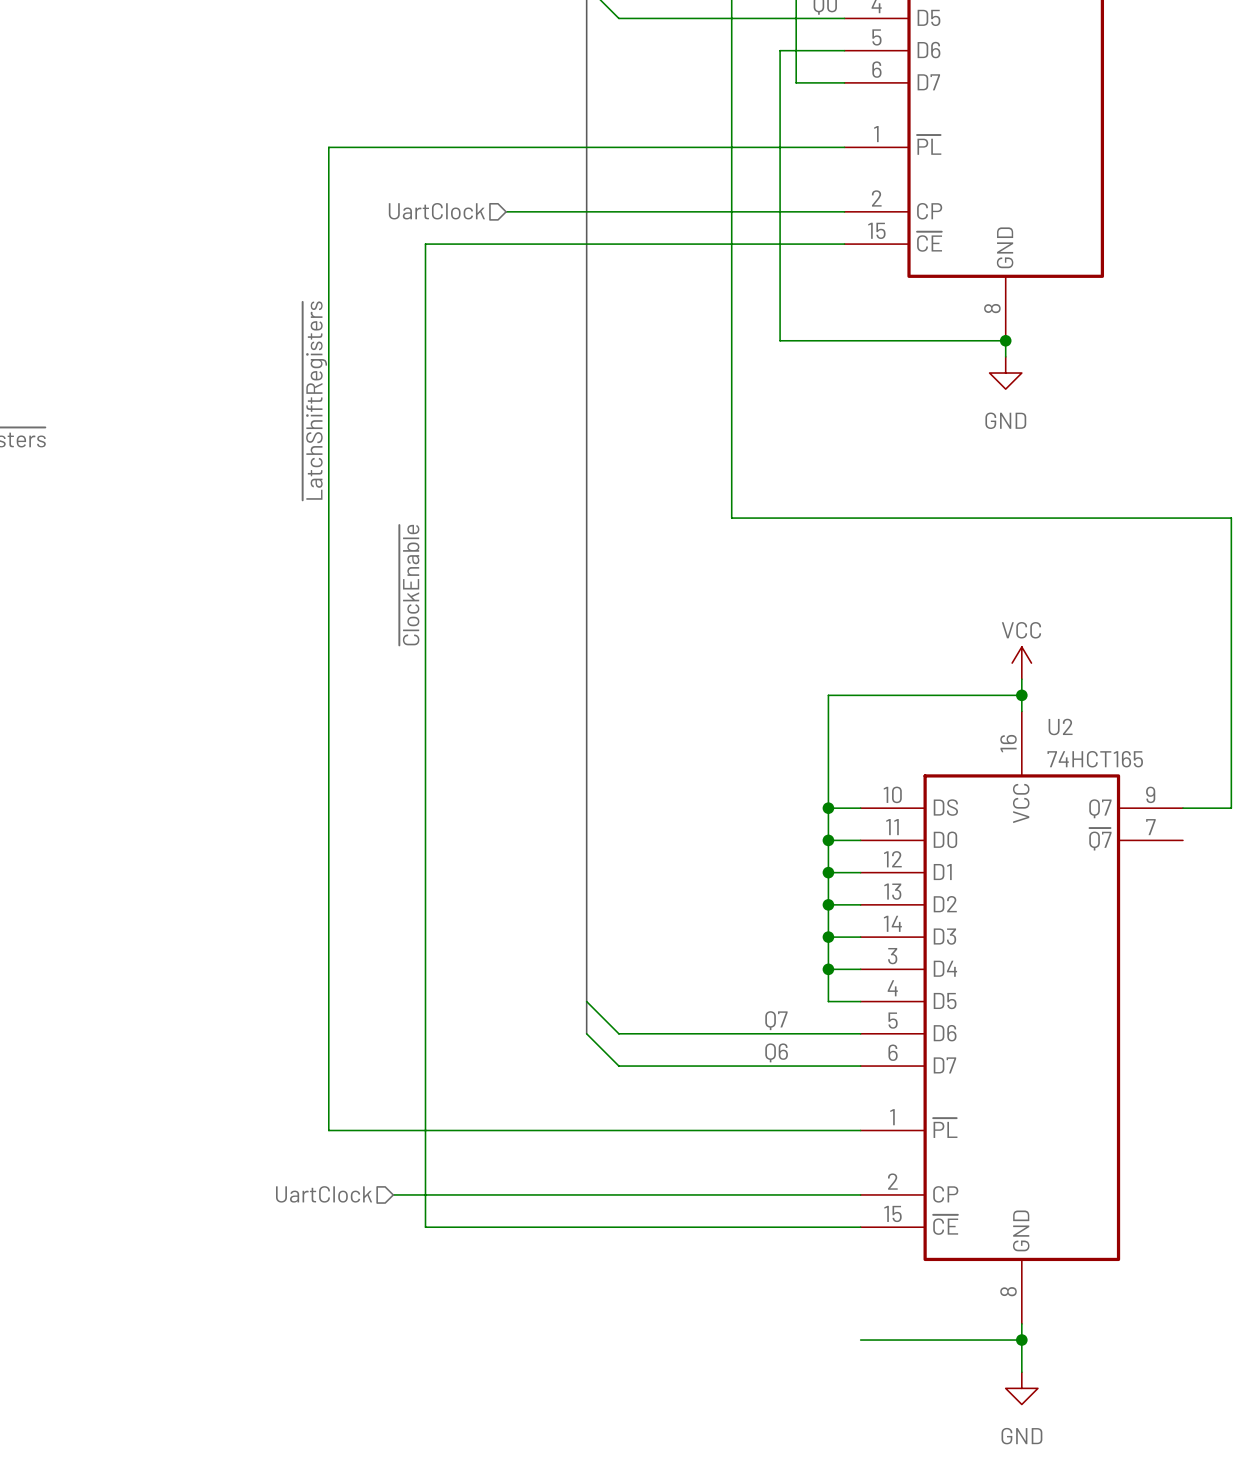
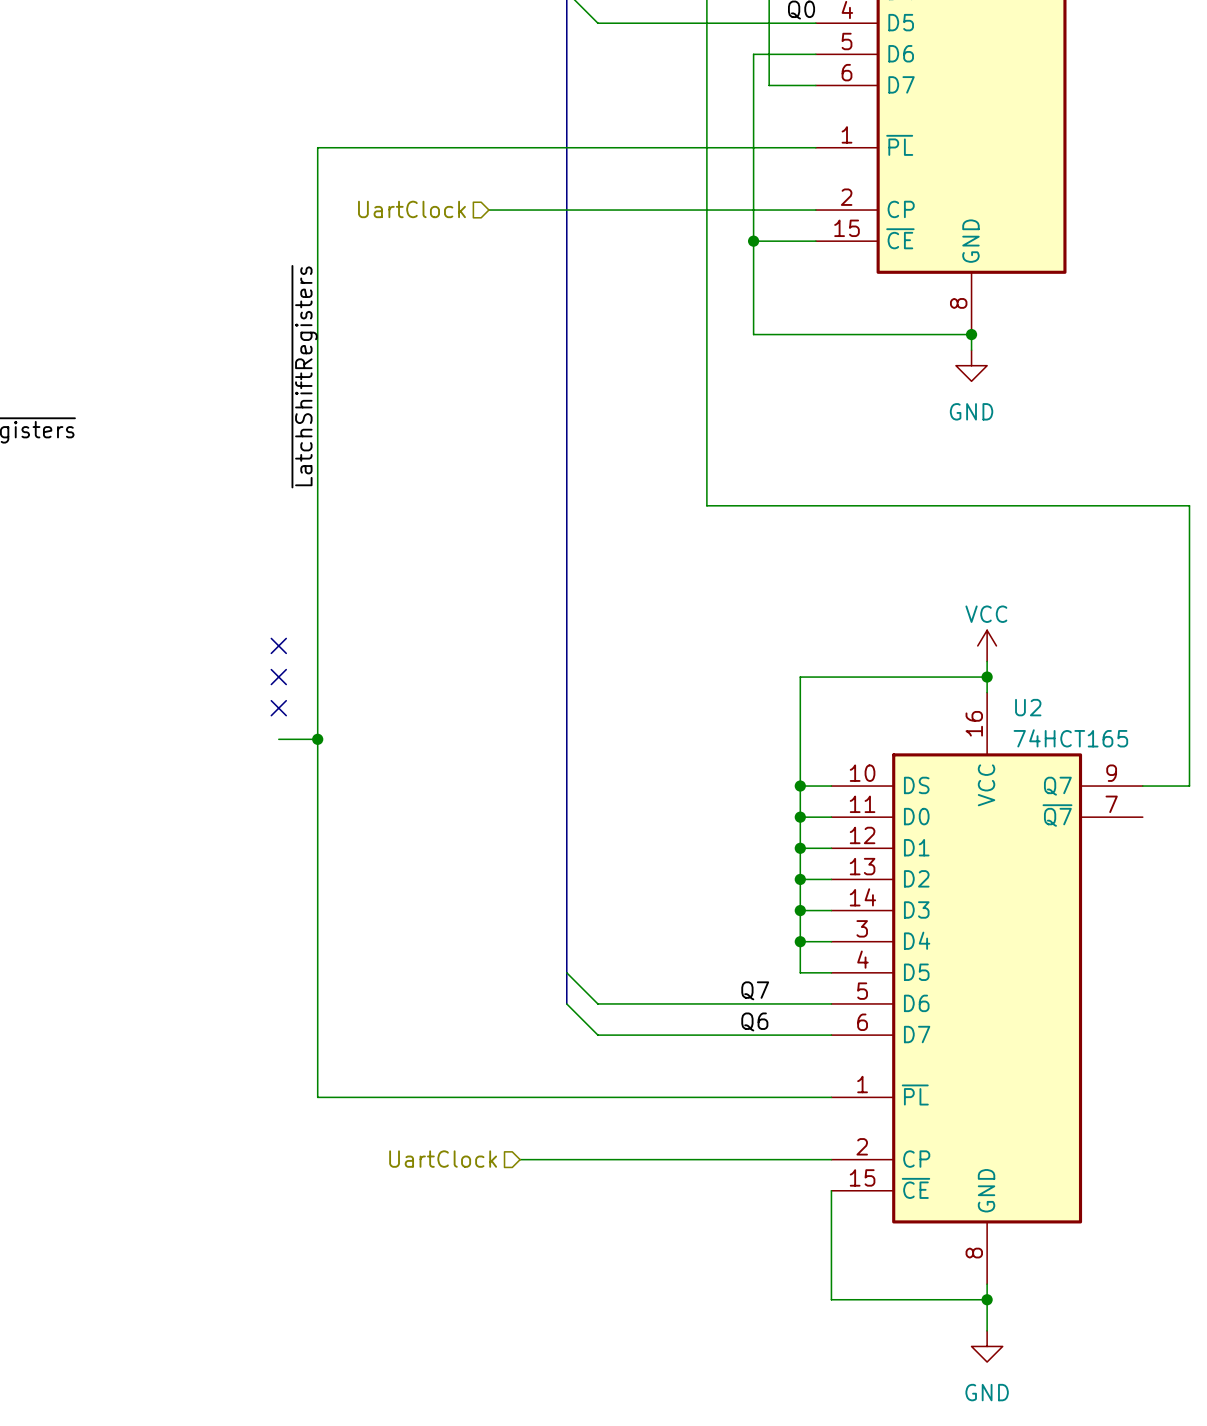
wire: (780, 244) (425, 244) (425, 1227) (860, 1227) -> (831, 1299) (831, 1190)
junction: none -> (753, 241)
label: ~{ClockEnable} (409, 585) -> none
no-connect mark: none -> (278, 645)
no-connect mark: none -> (278, 677)
no-connect mark: none -> (278, 708)
wire: none -> (278, 739) (317, 739)
junction: none -> (317, 739)
hierarchical label position: UartClock (324, 1194) -> UartClock (443, 1159)
wire: (393, 1194) (538, 1194) -> none

